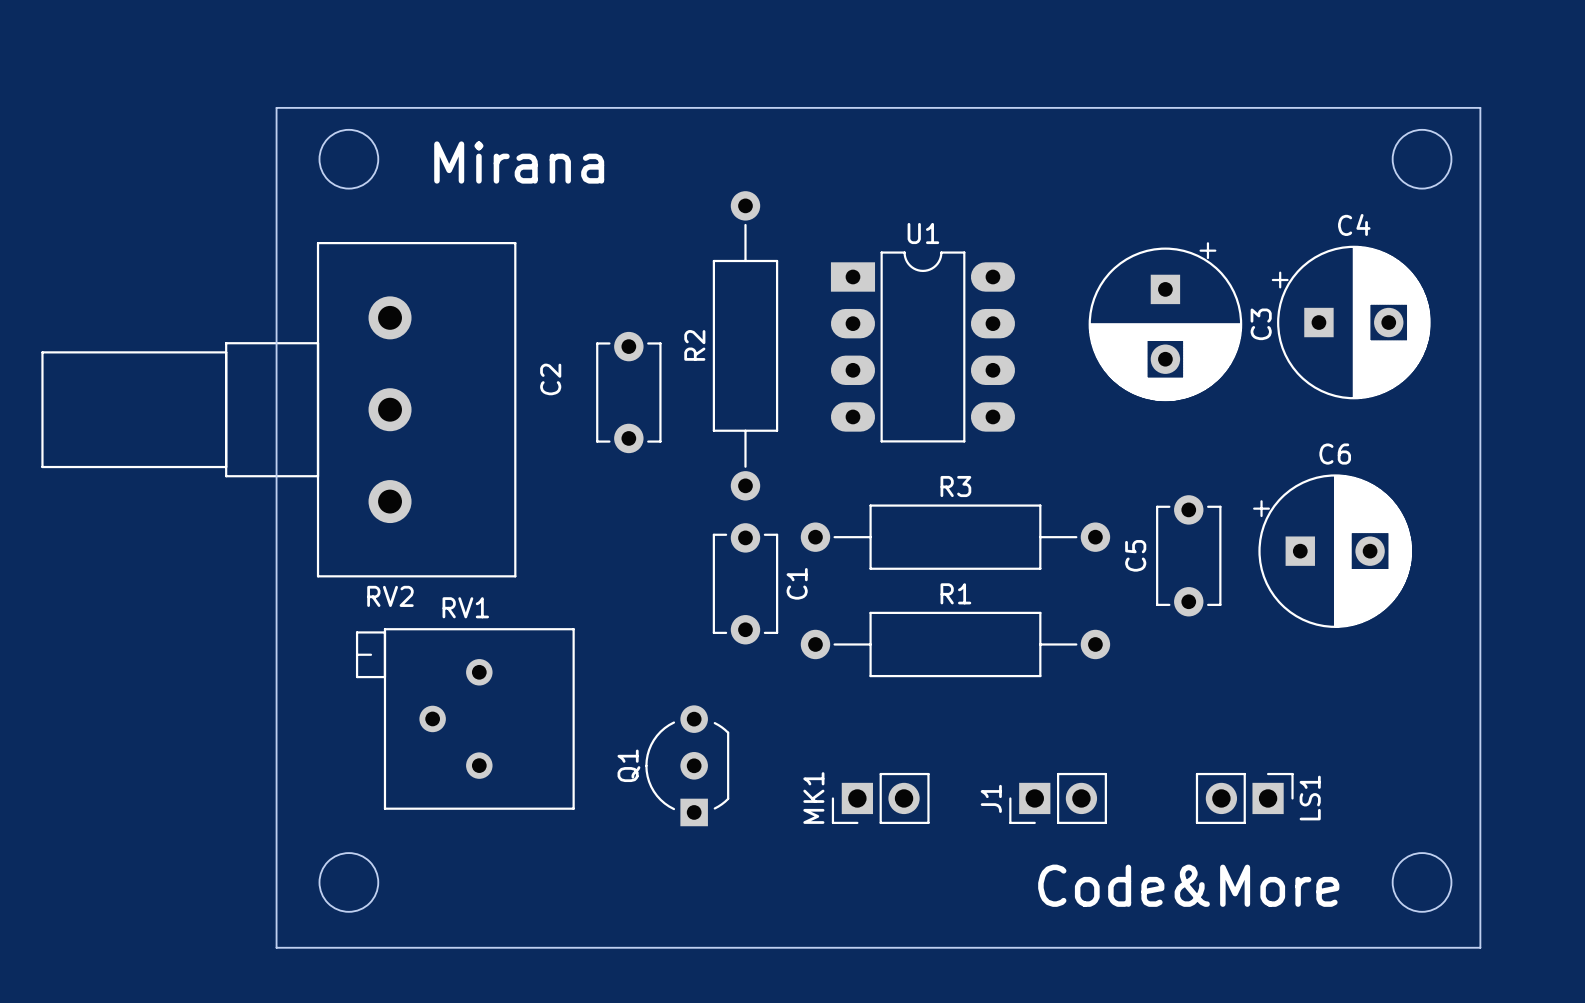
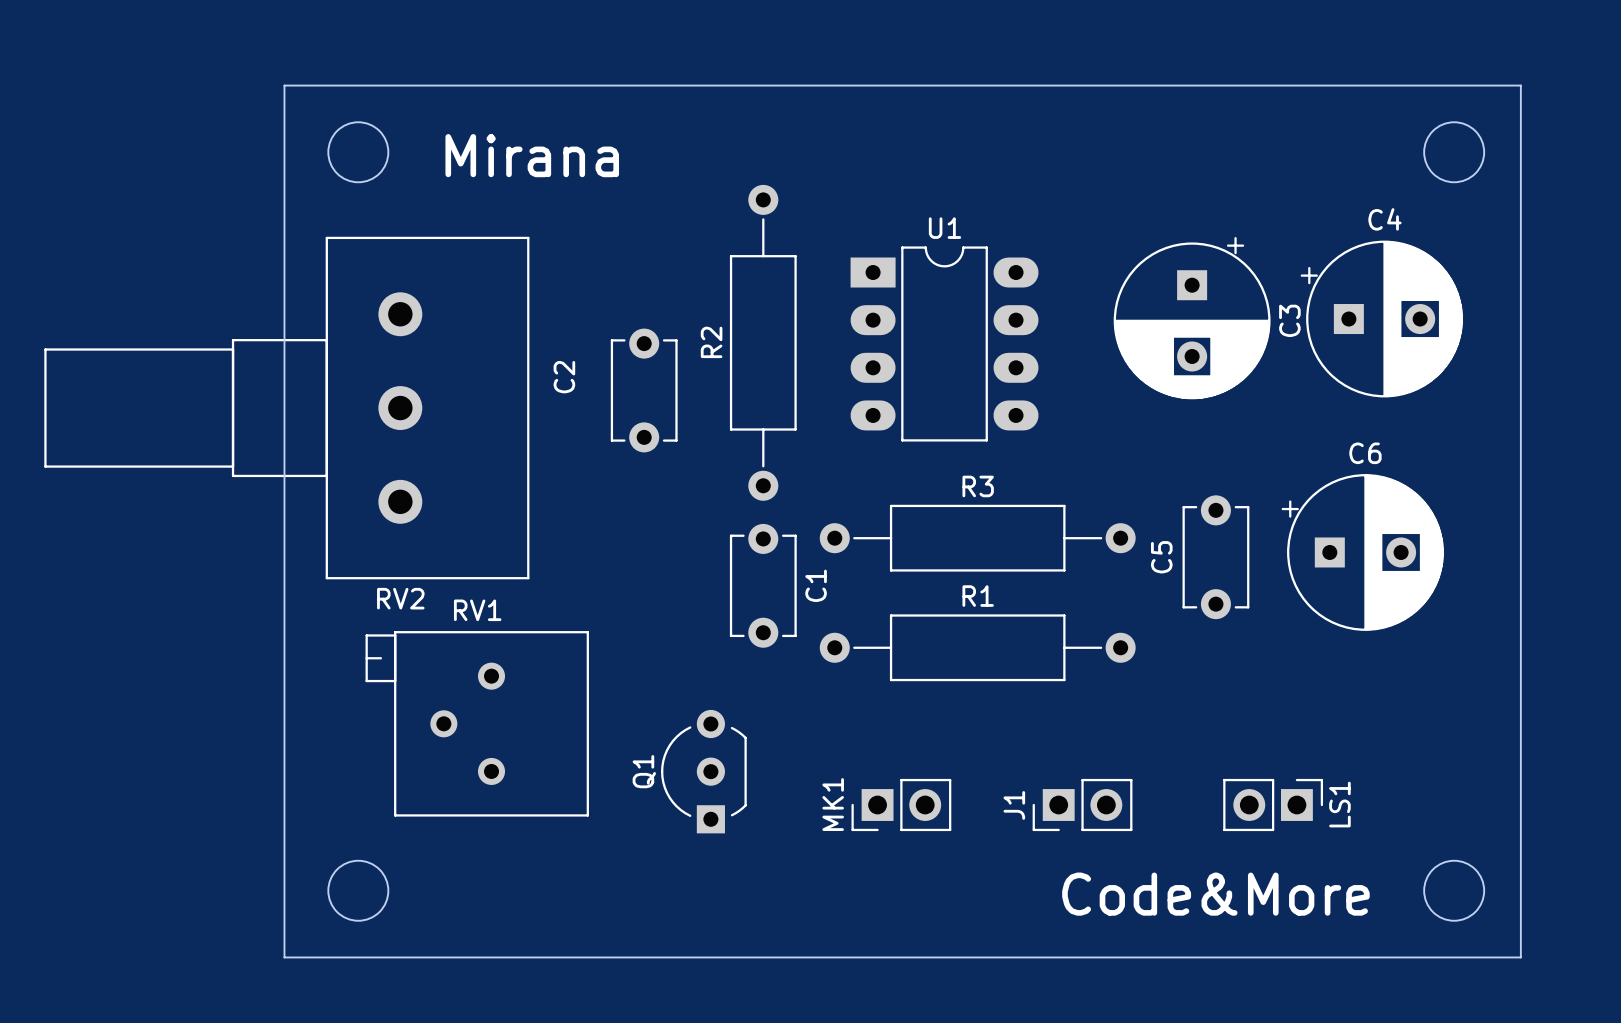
board edge: (276, 107) (1480, 107) (1480, 947) -> (284, 99) (284, 85) (1520, 85) (1520, 957) (1513, 957)

